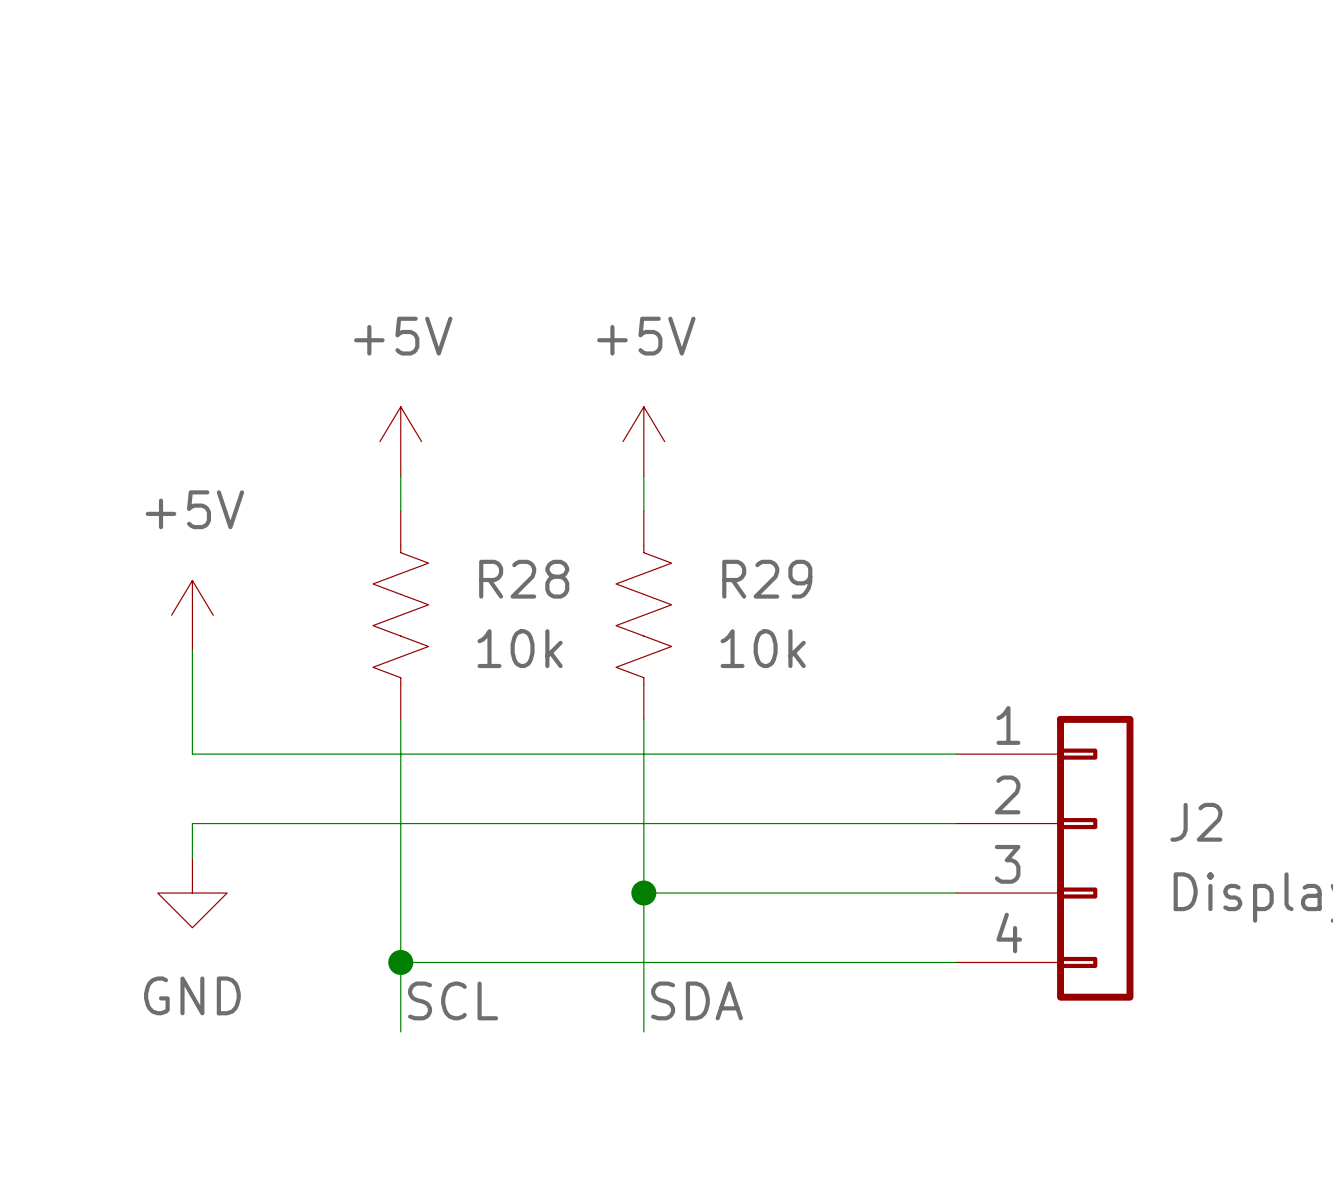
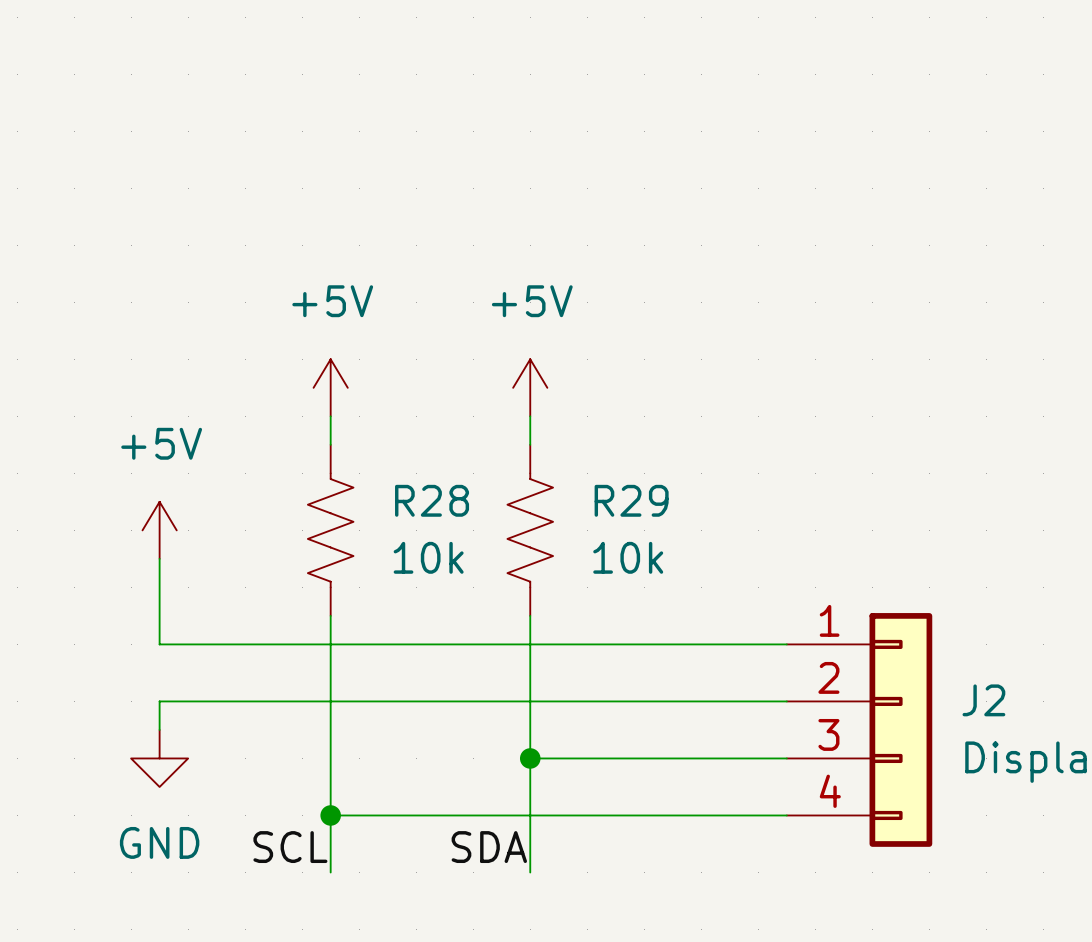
label position: SCL (453, 1000) -> SCL (290, 847)
label position: SDA (697, 1000) -> SDA (489, 847)

